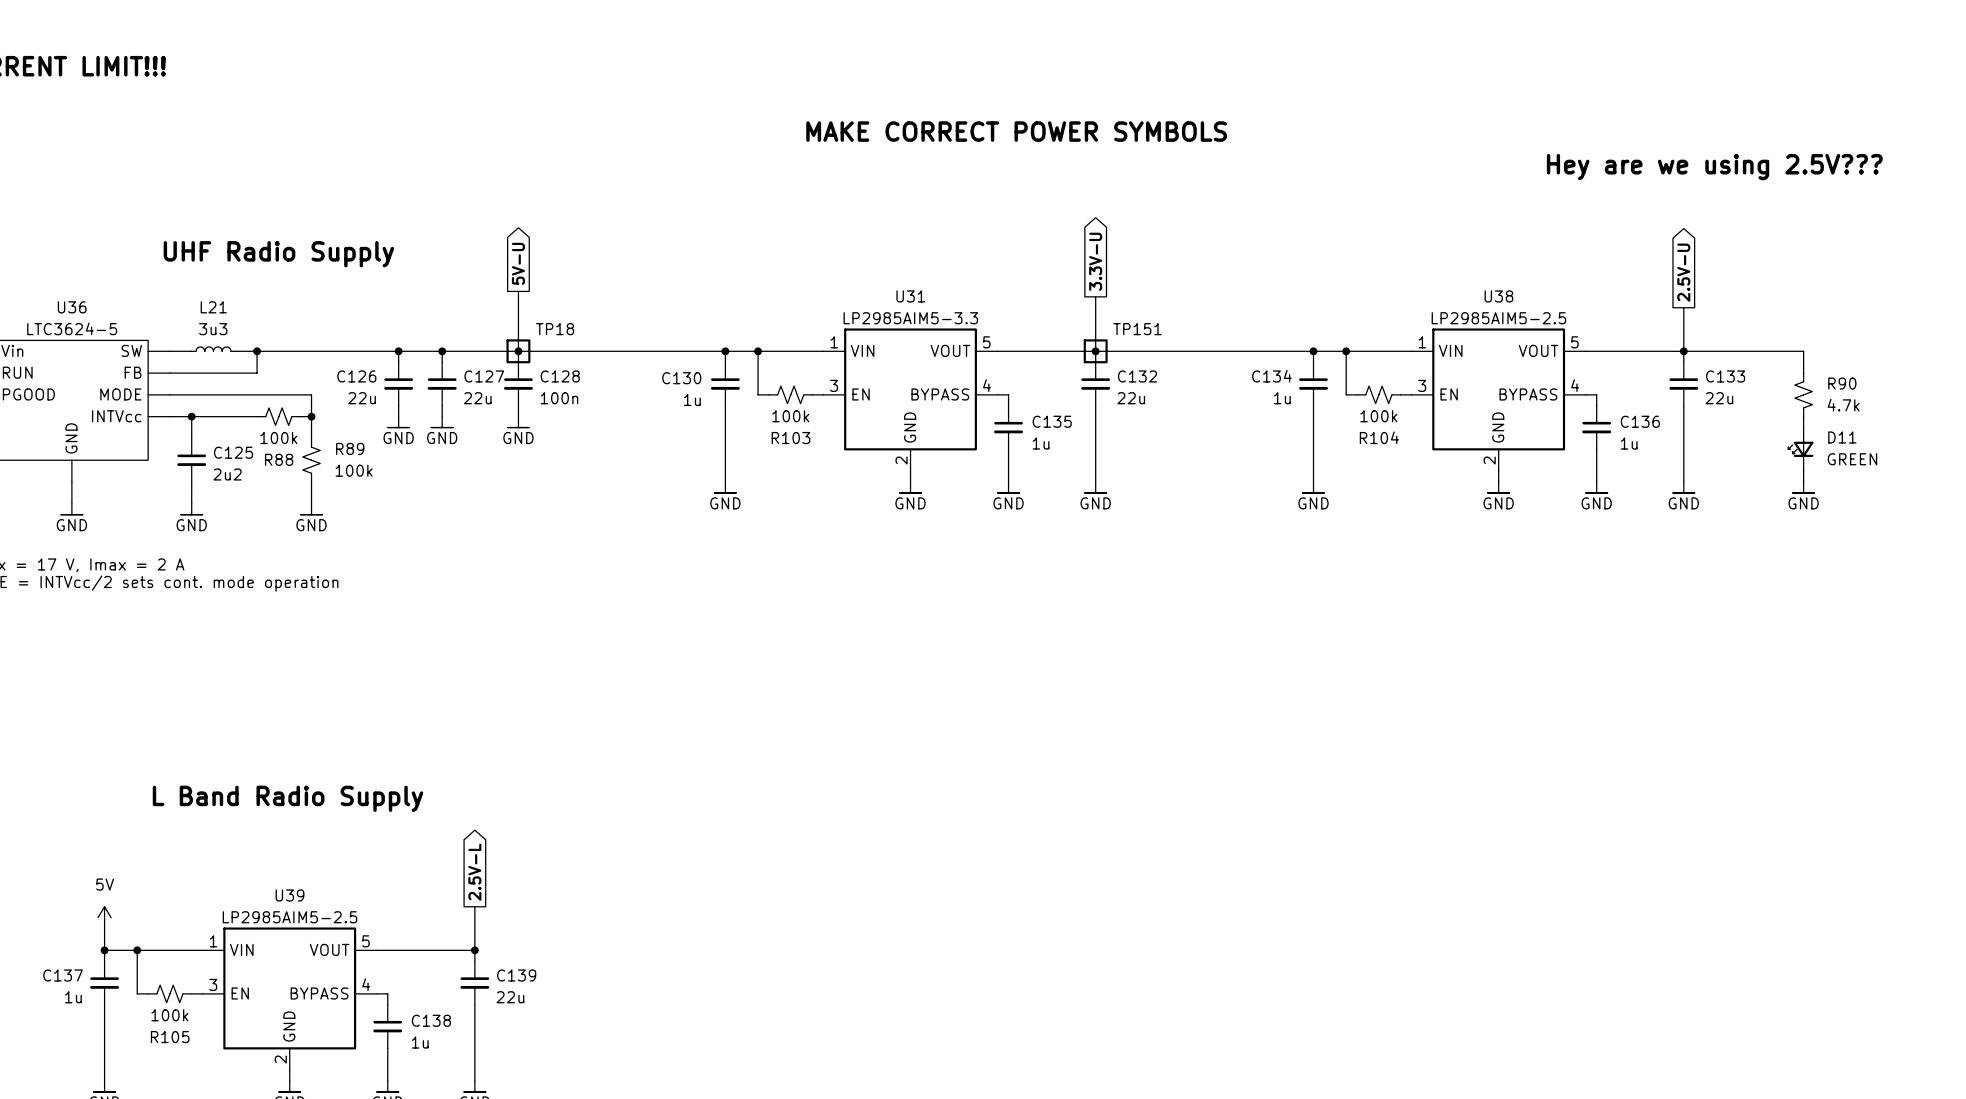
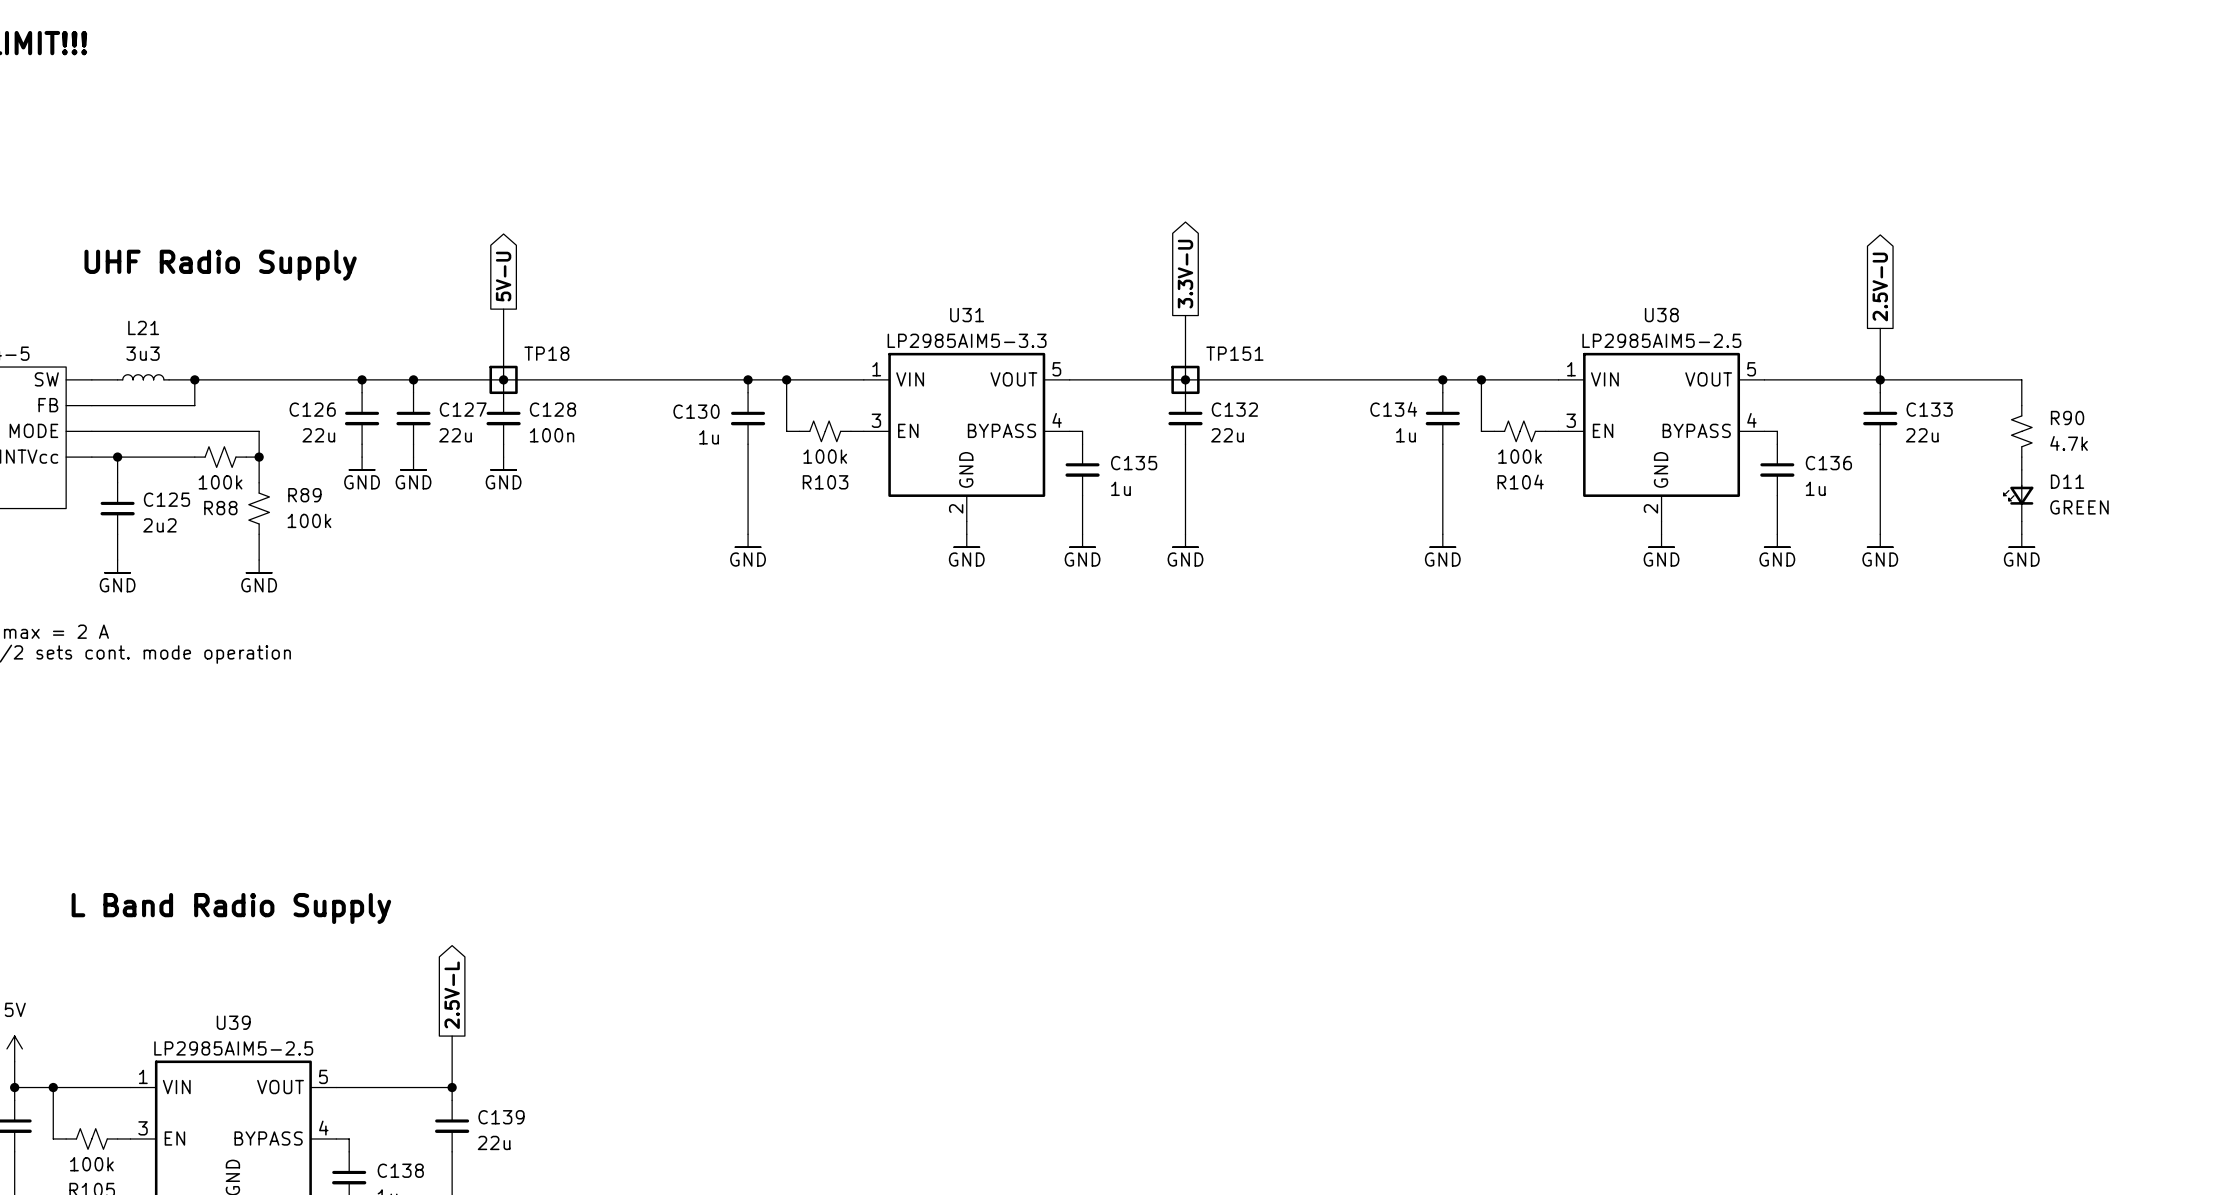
text: MAKE CORRECT POWER SYMBOLS (1016, 131) -> none
text: Hey are we using 2.5V??? (1714, 167) -> none

